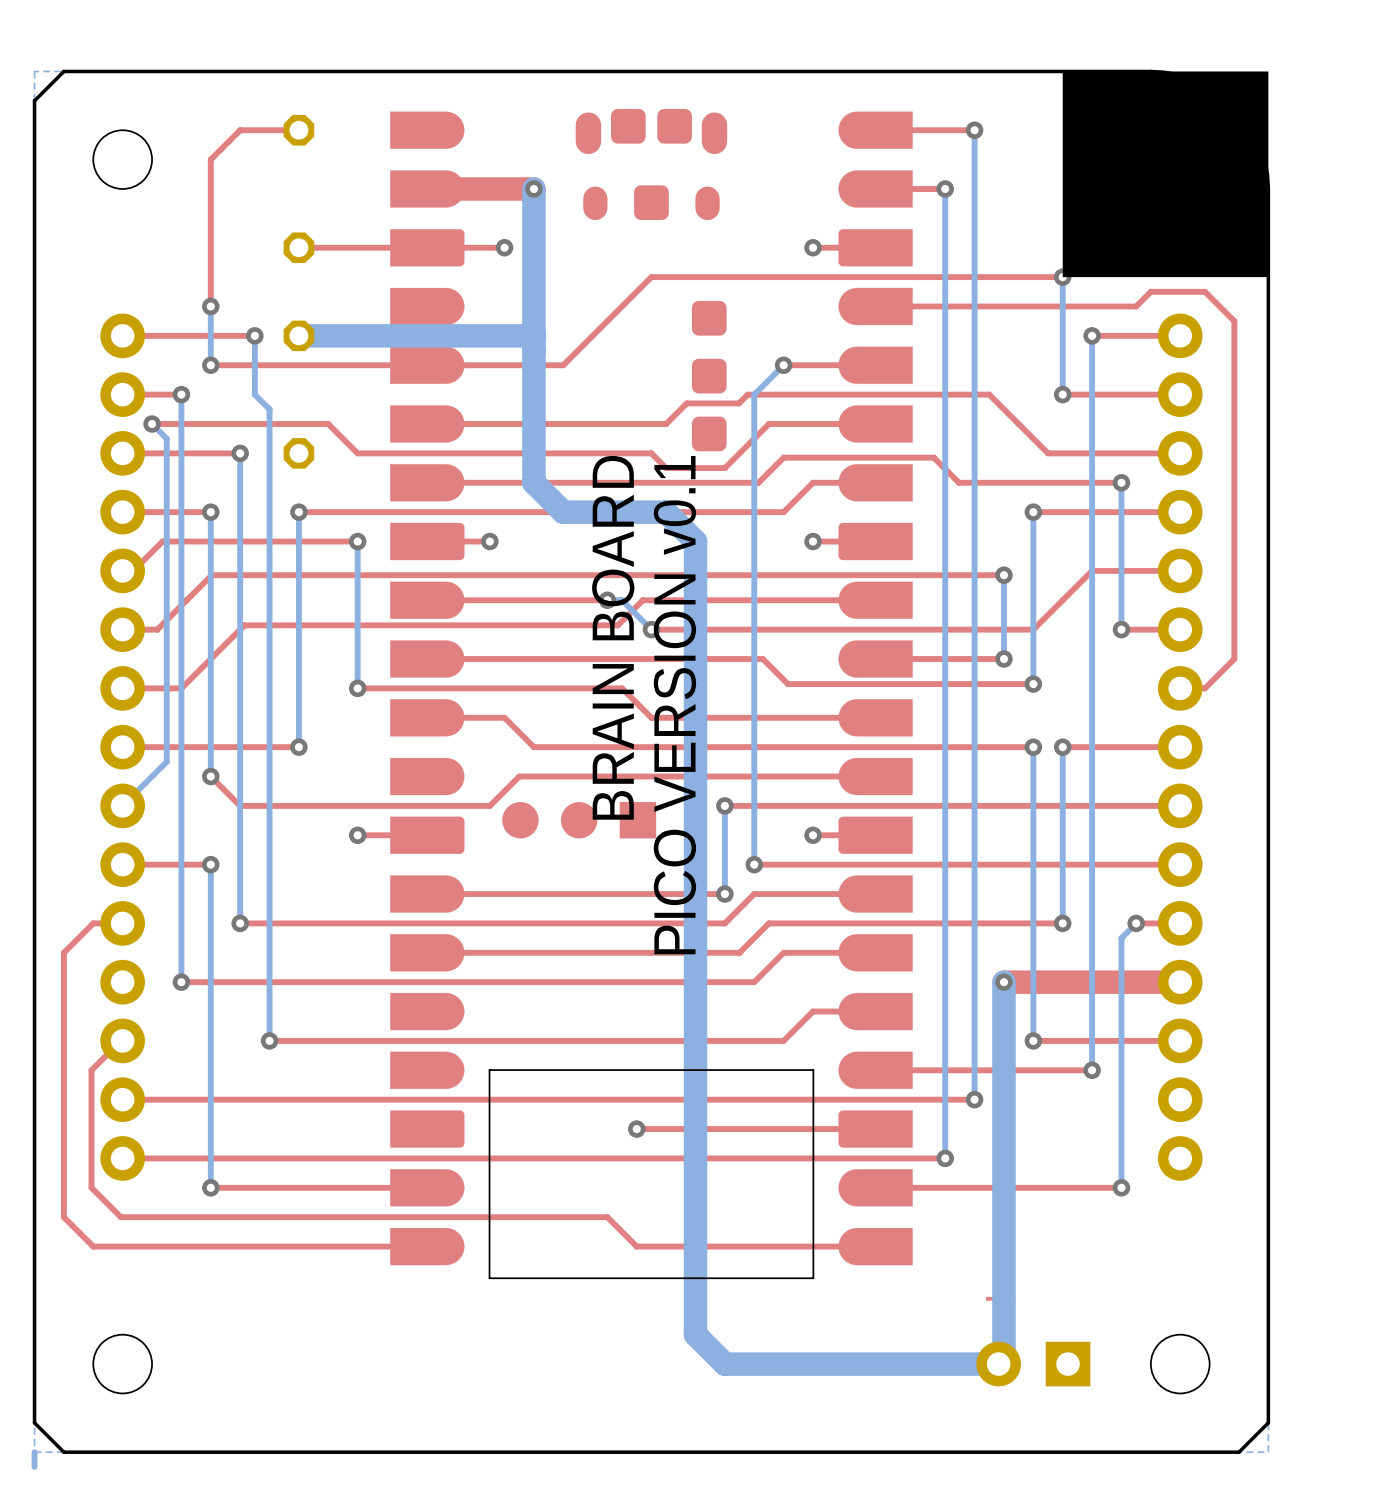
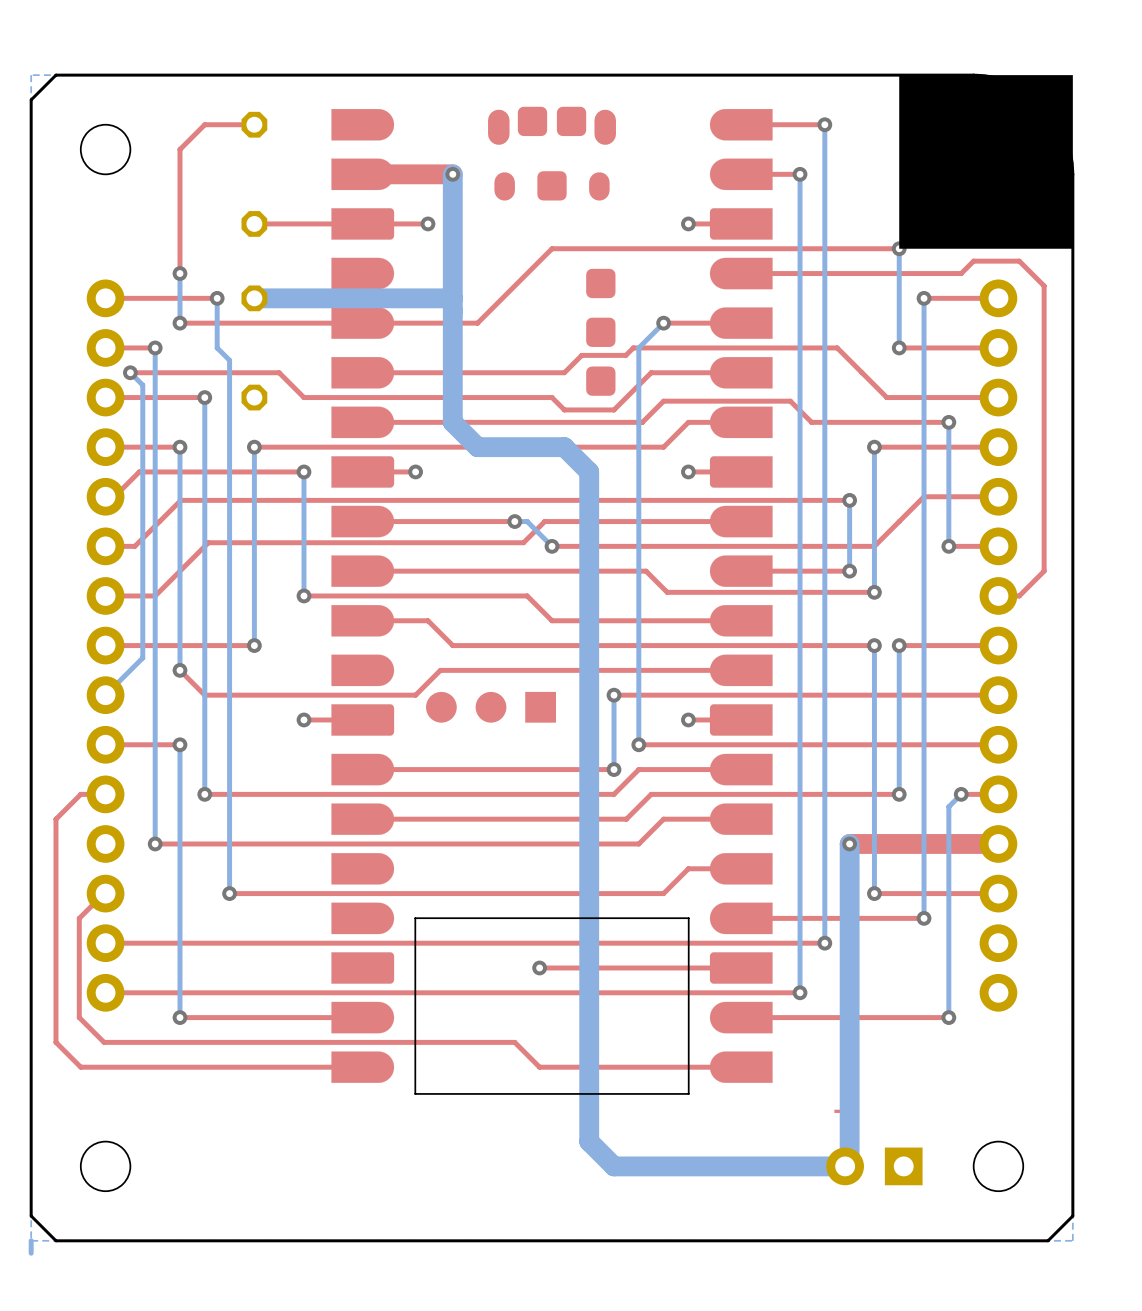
text: BRAIN BOARD (613, 637) -> none
text: PICO VERSION v0.1 (674, 705) -> none

